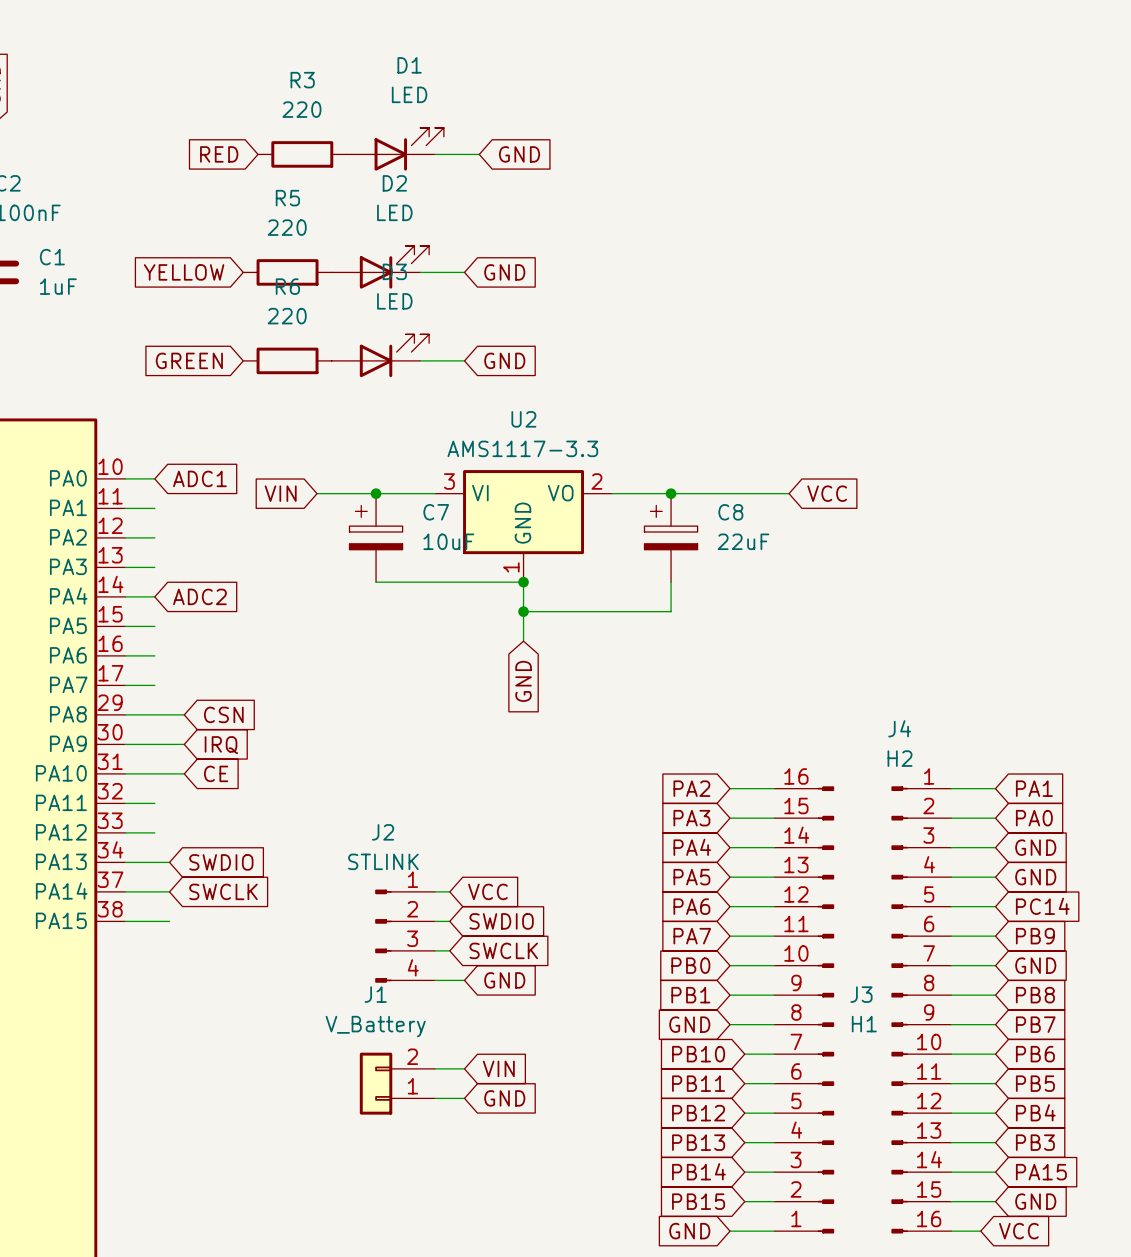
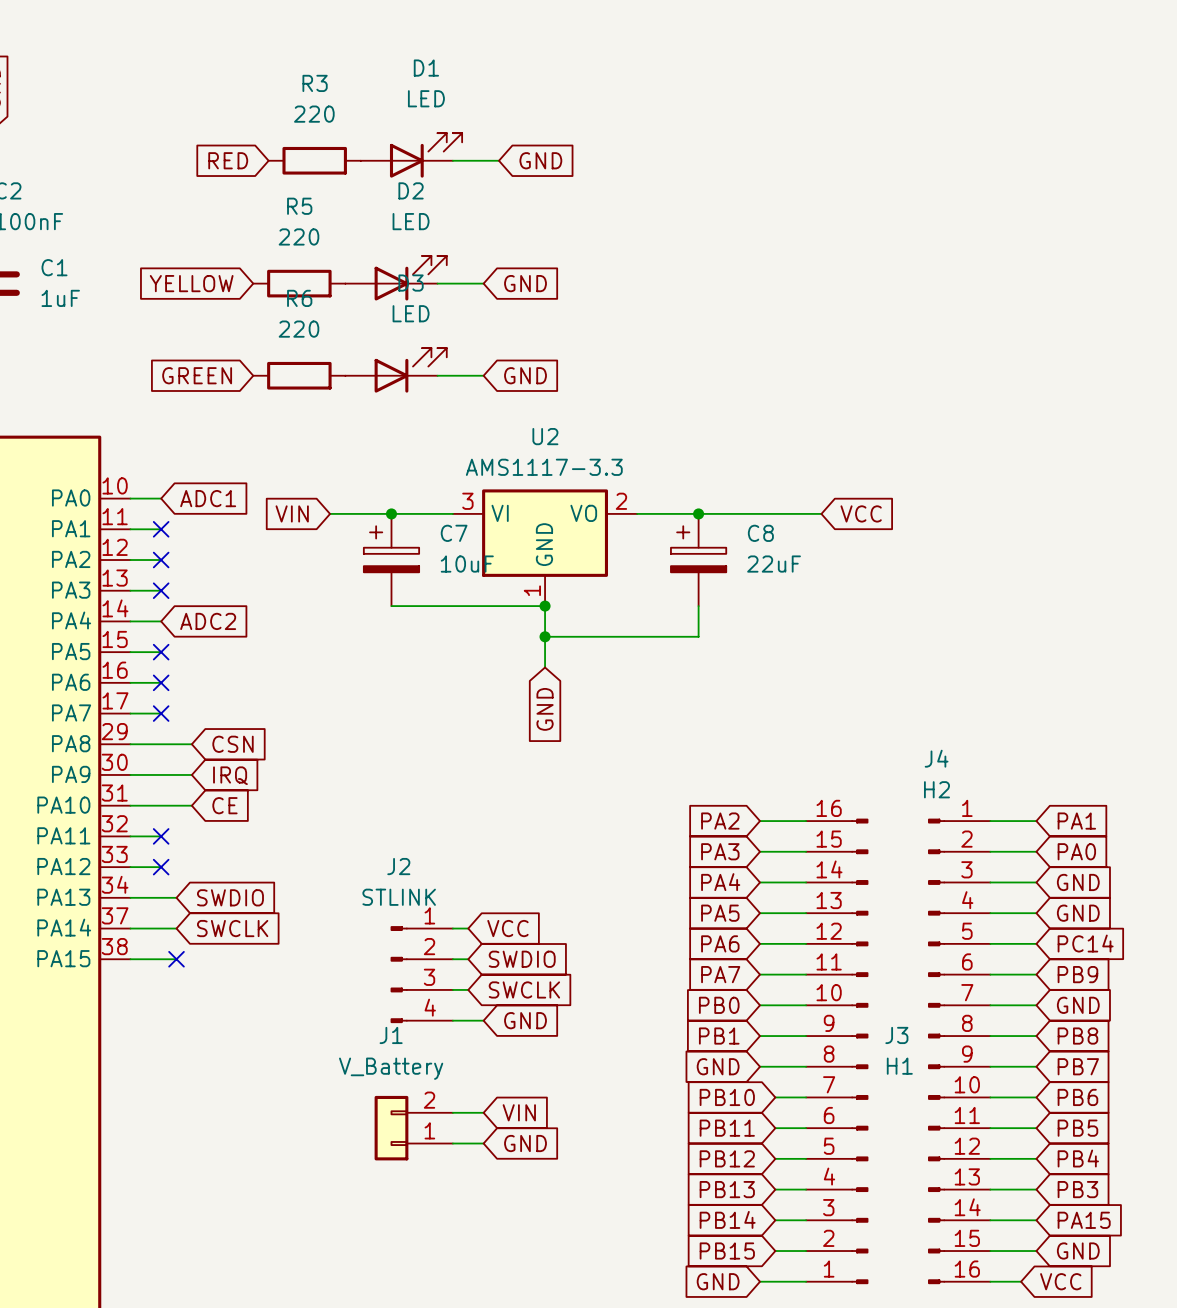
no-connect mark: none -> (161, 529)
no-connect mark: none -> (161, 560)
no-connect mark: none -> (161, 590)
no-connect mark: none -> (161, 652)
no-connect mark: none -> (161, 682)
no-connect mark: none -> (161, 713)
no-connect mark: none -> (161, 836)
no-connect mark: none -> (161, 867)
no-connect mark: none -> (176, 959)

